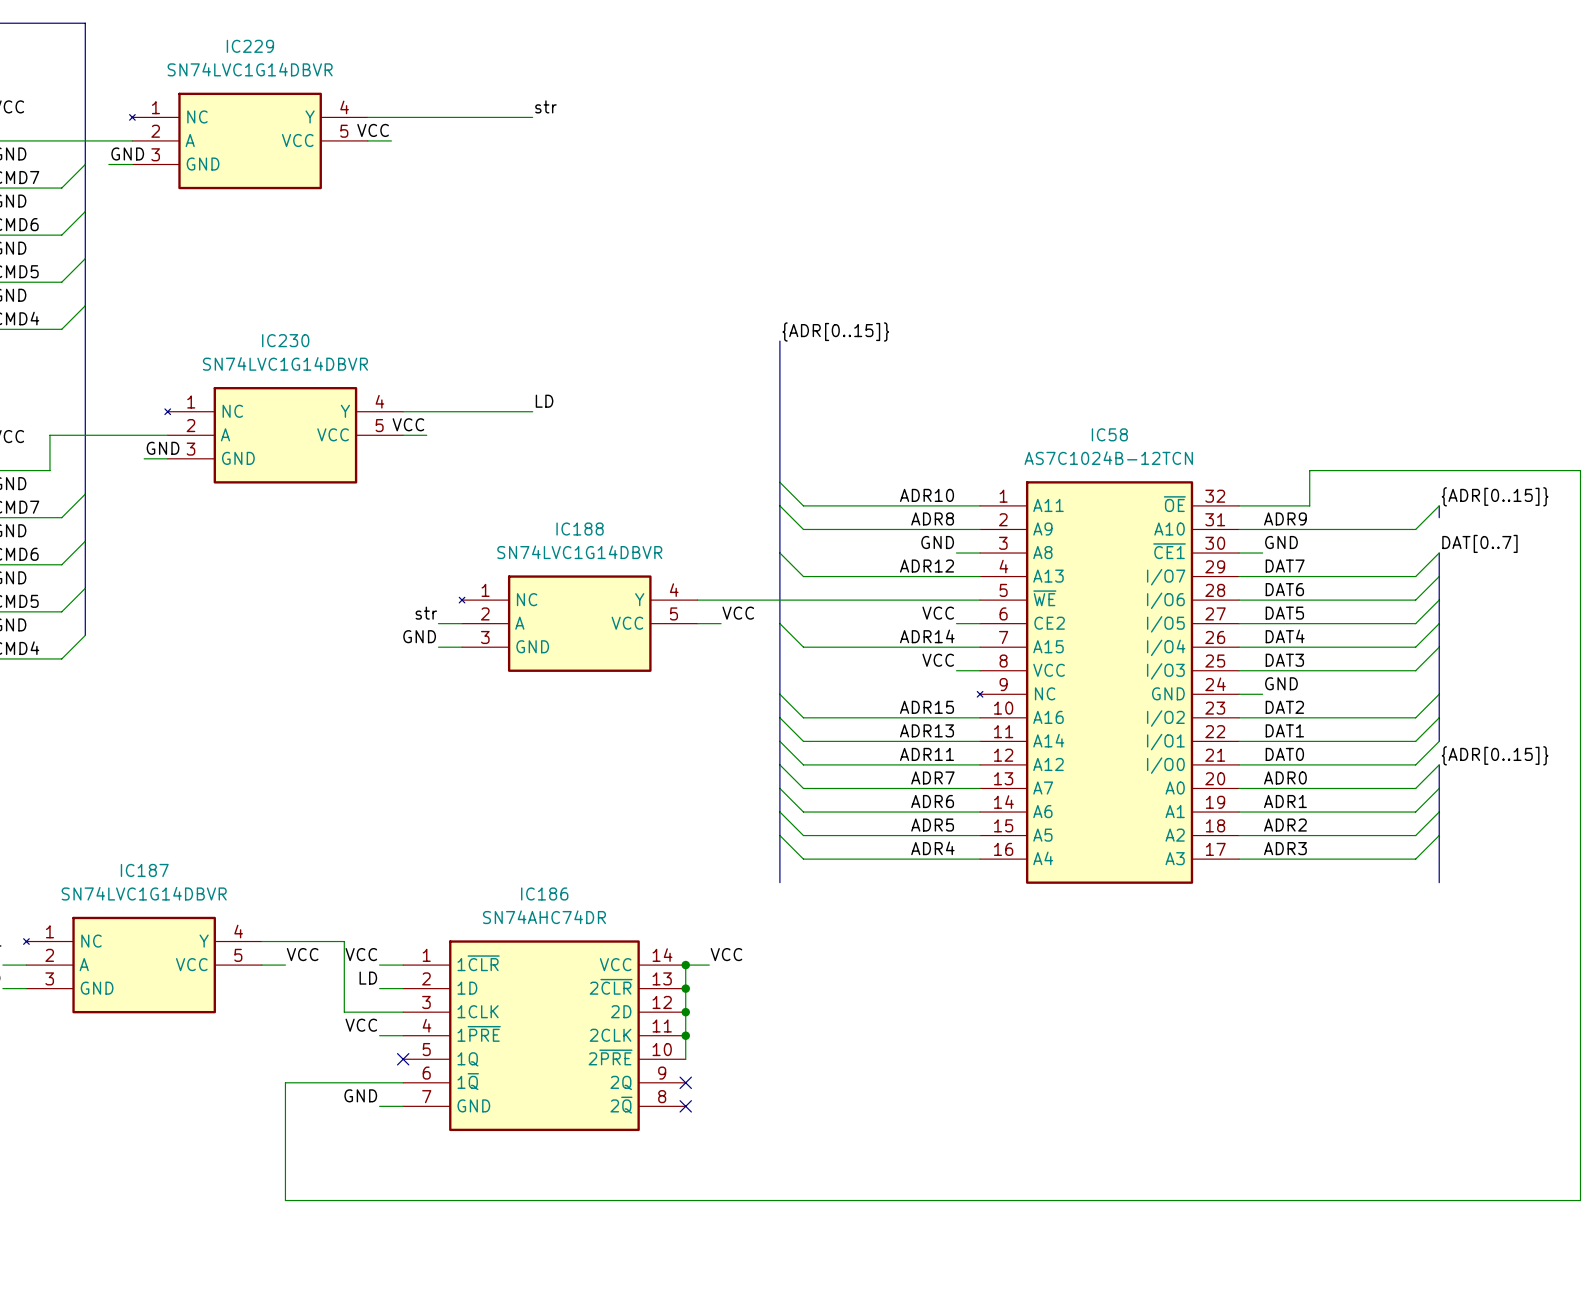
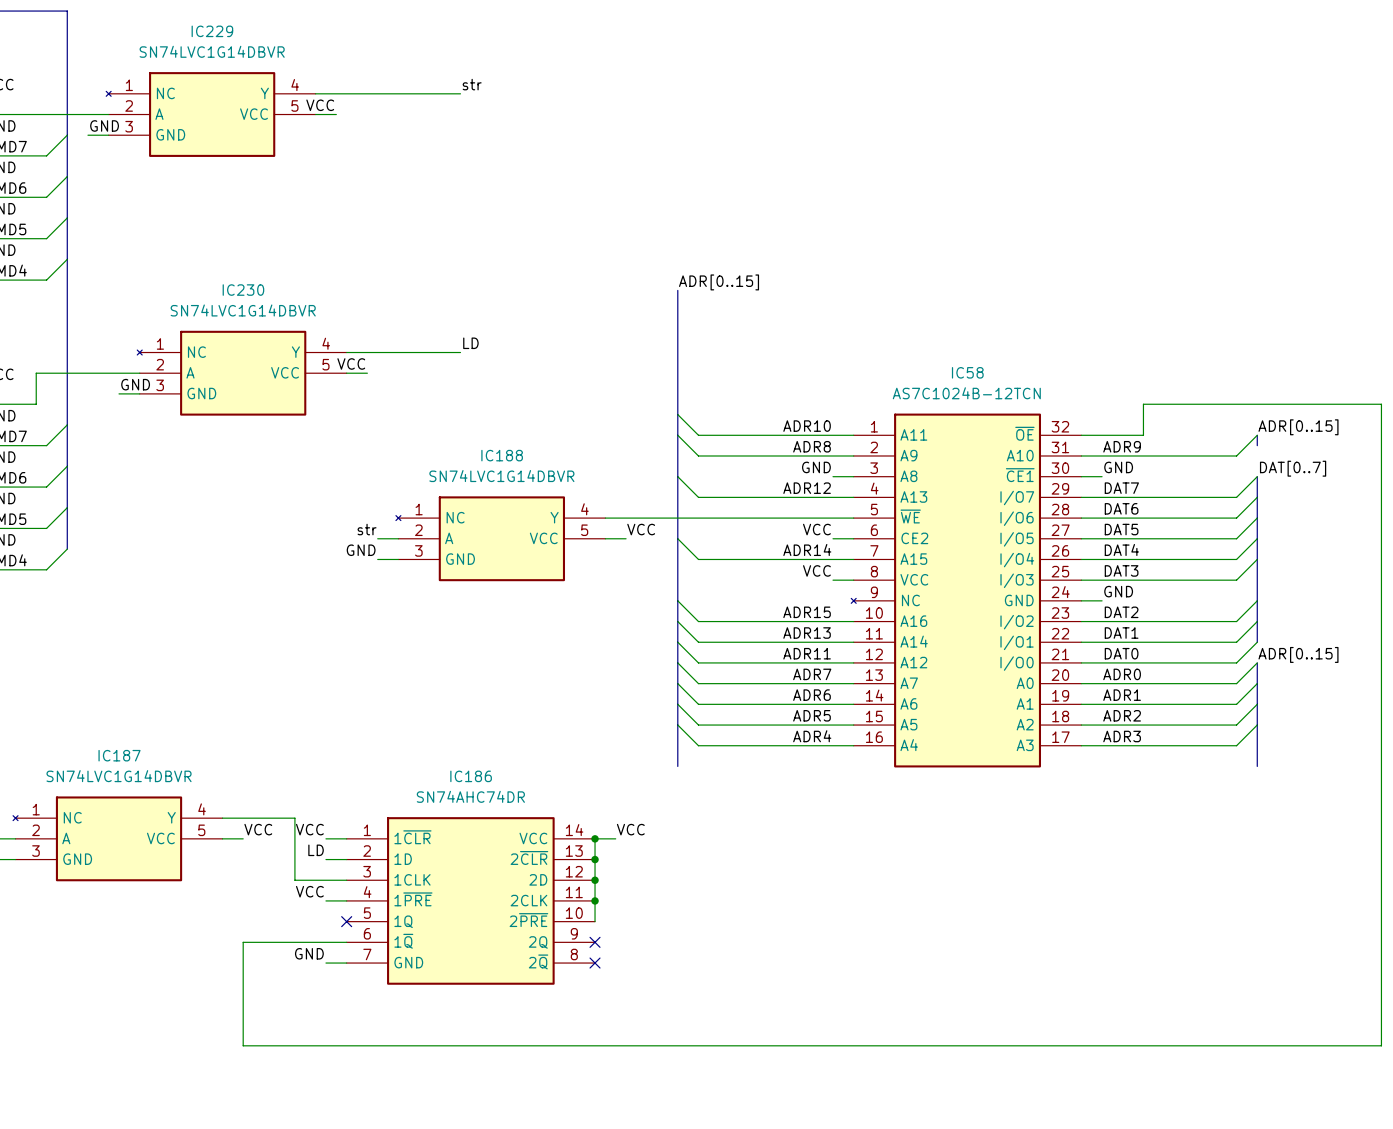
label: {ADR[0..15]} (835, 331) -> ADR[0..15] (719, 282)
label: {ADR[0..15]} (1495, 496) -> ADR[0..15] (1298, 427)
label: {ADR[0..15]} (1495, 755) -> ADR[0..15] (1298, 654)

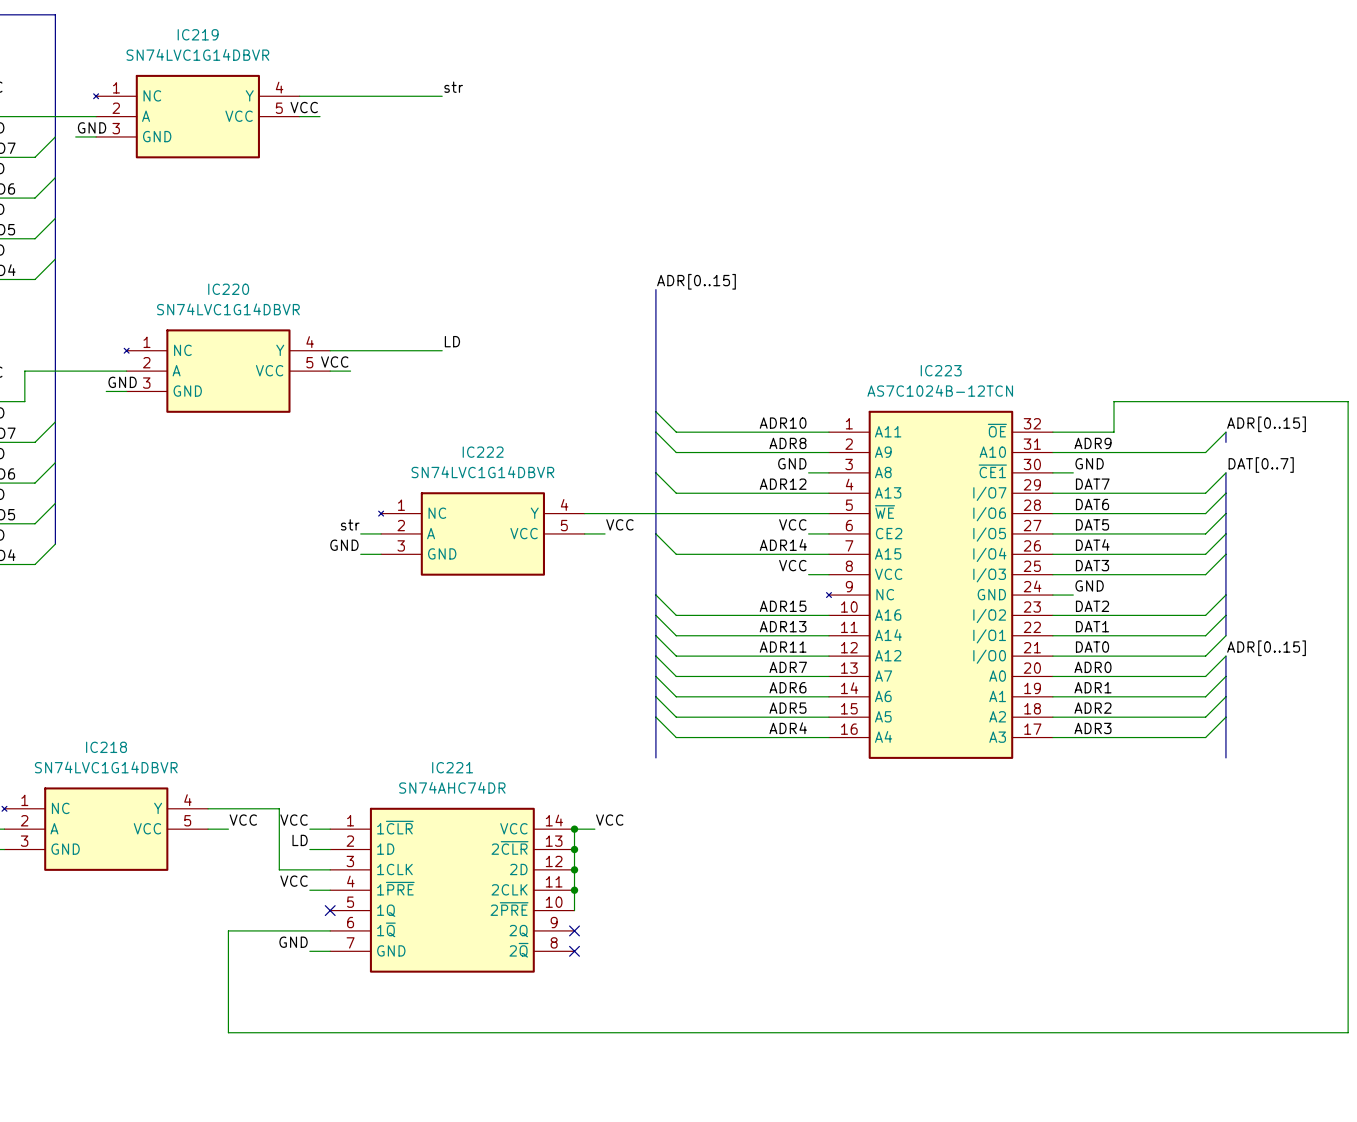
IC229 name: IC229 (212, 31) -> IC219 (198, 34)
IC230 name: IC230 (243, 290) -> IC220 (228, 289)
IC58 name: IC58 (967, 372) -> IC223 (941, 370)
IC188 name: IC188 (502, 455) -> IC222 (483, 452)
IC187 name: IC187 (119, 755) -> IC218 (106, 747)
IC186 name: IC186 (471, 776) -> IC221 (452, 767)

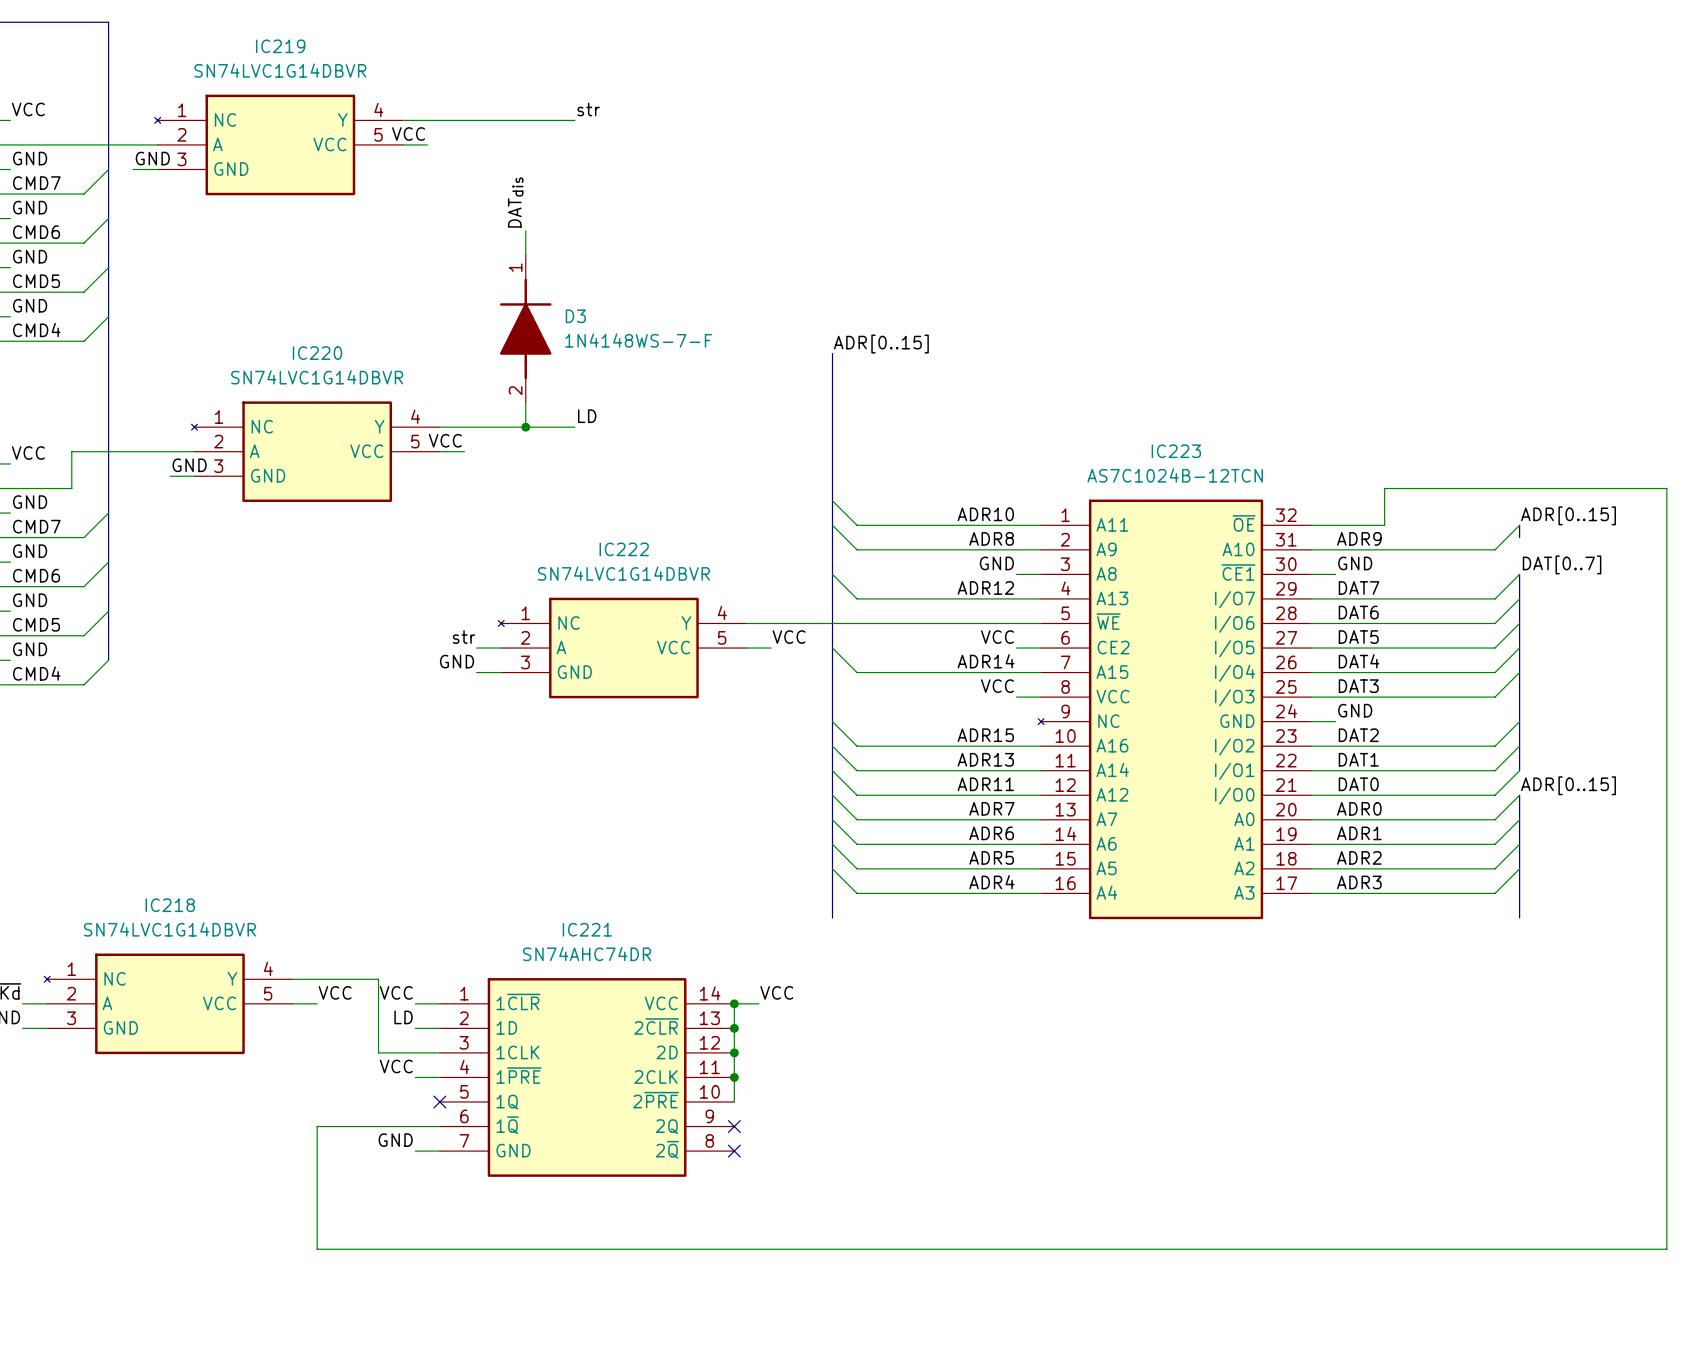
label: none -> DATdis (515, 202)
wire: none -> (525, 230) (525, 255)
D3: none -> 1N4148WS-7-F (525, 329)
wire: none -> (525, 402) (525, 427)
junction: none -> (525, 427)

